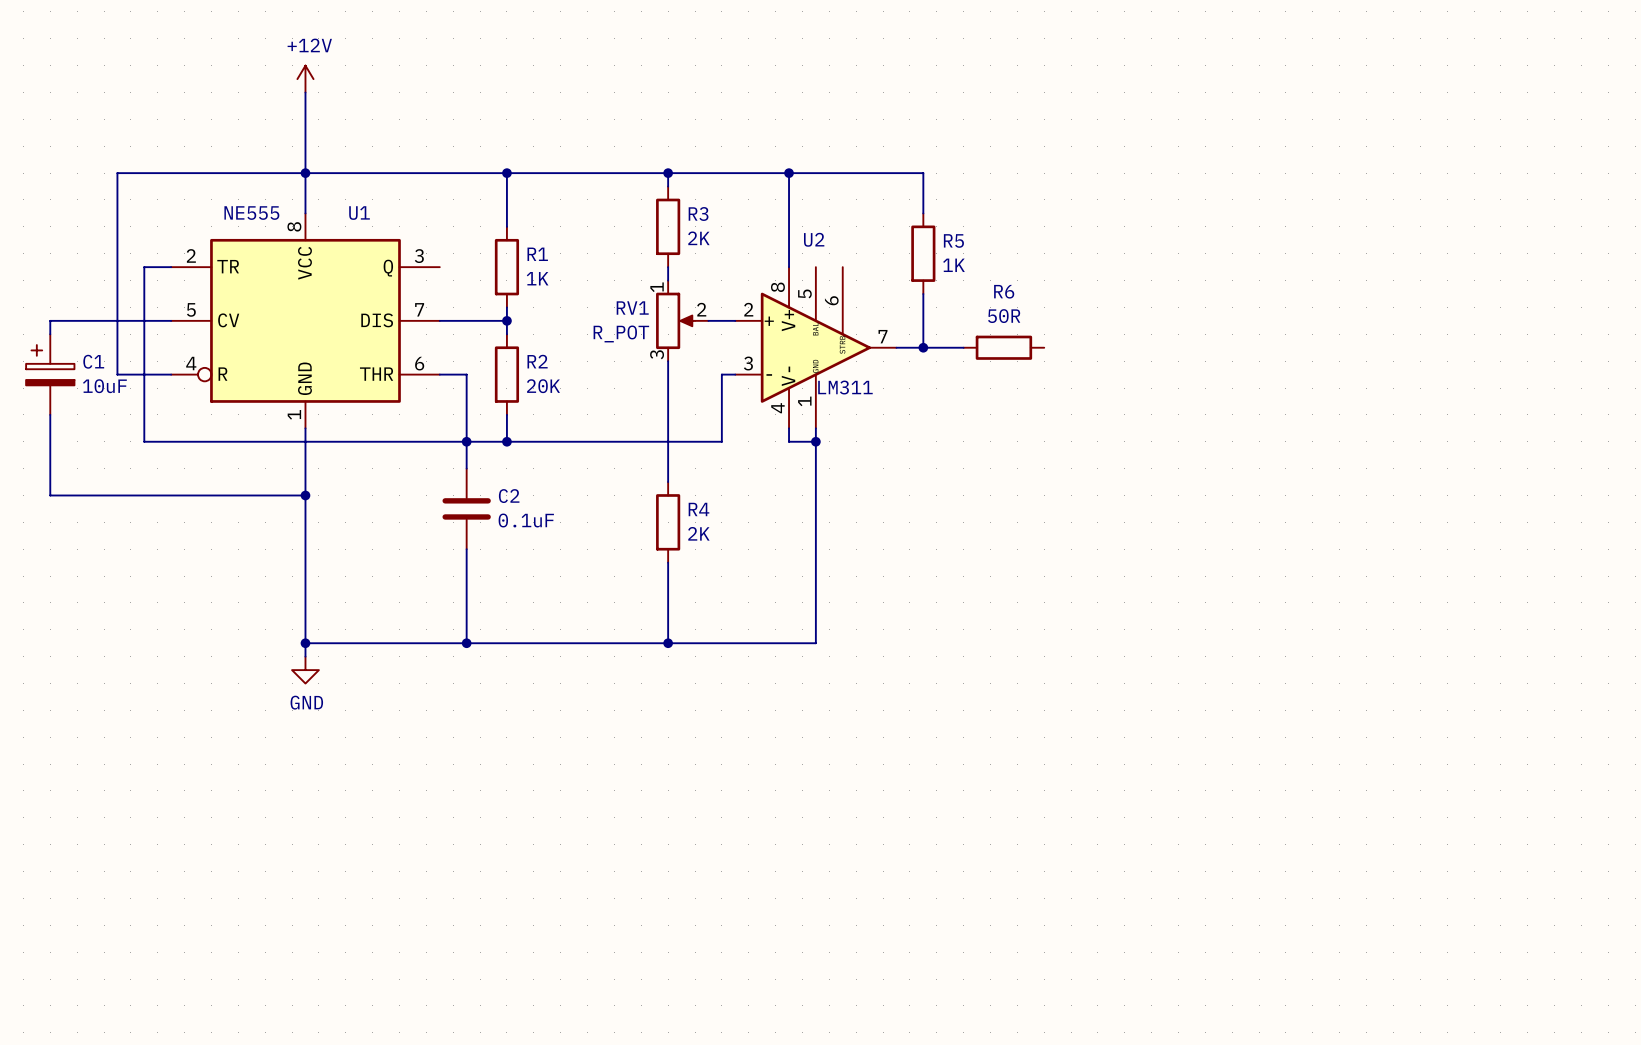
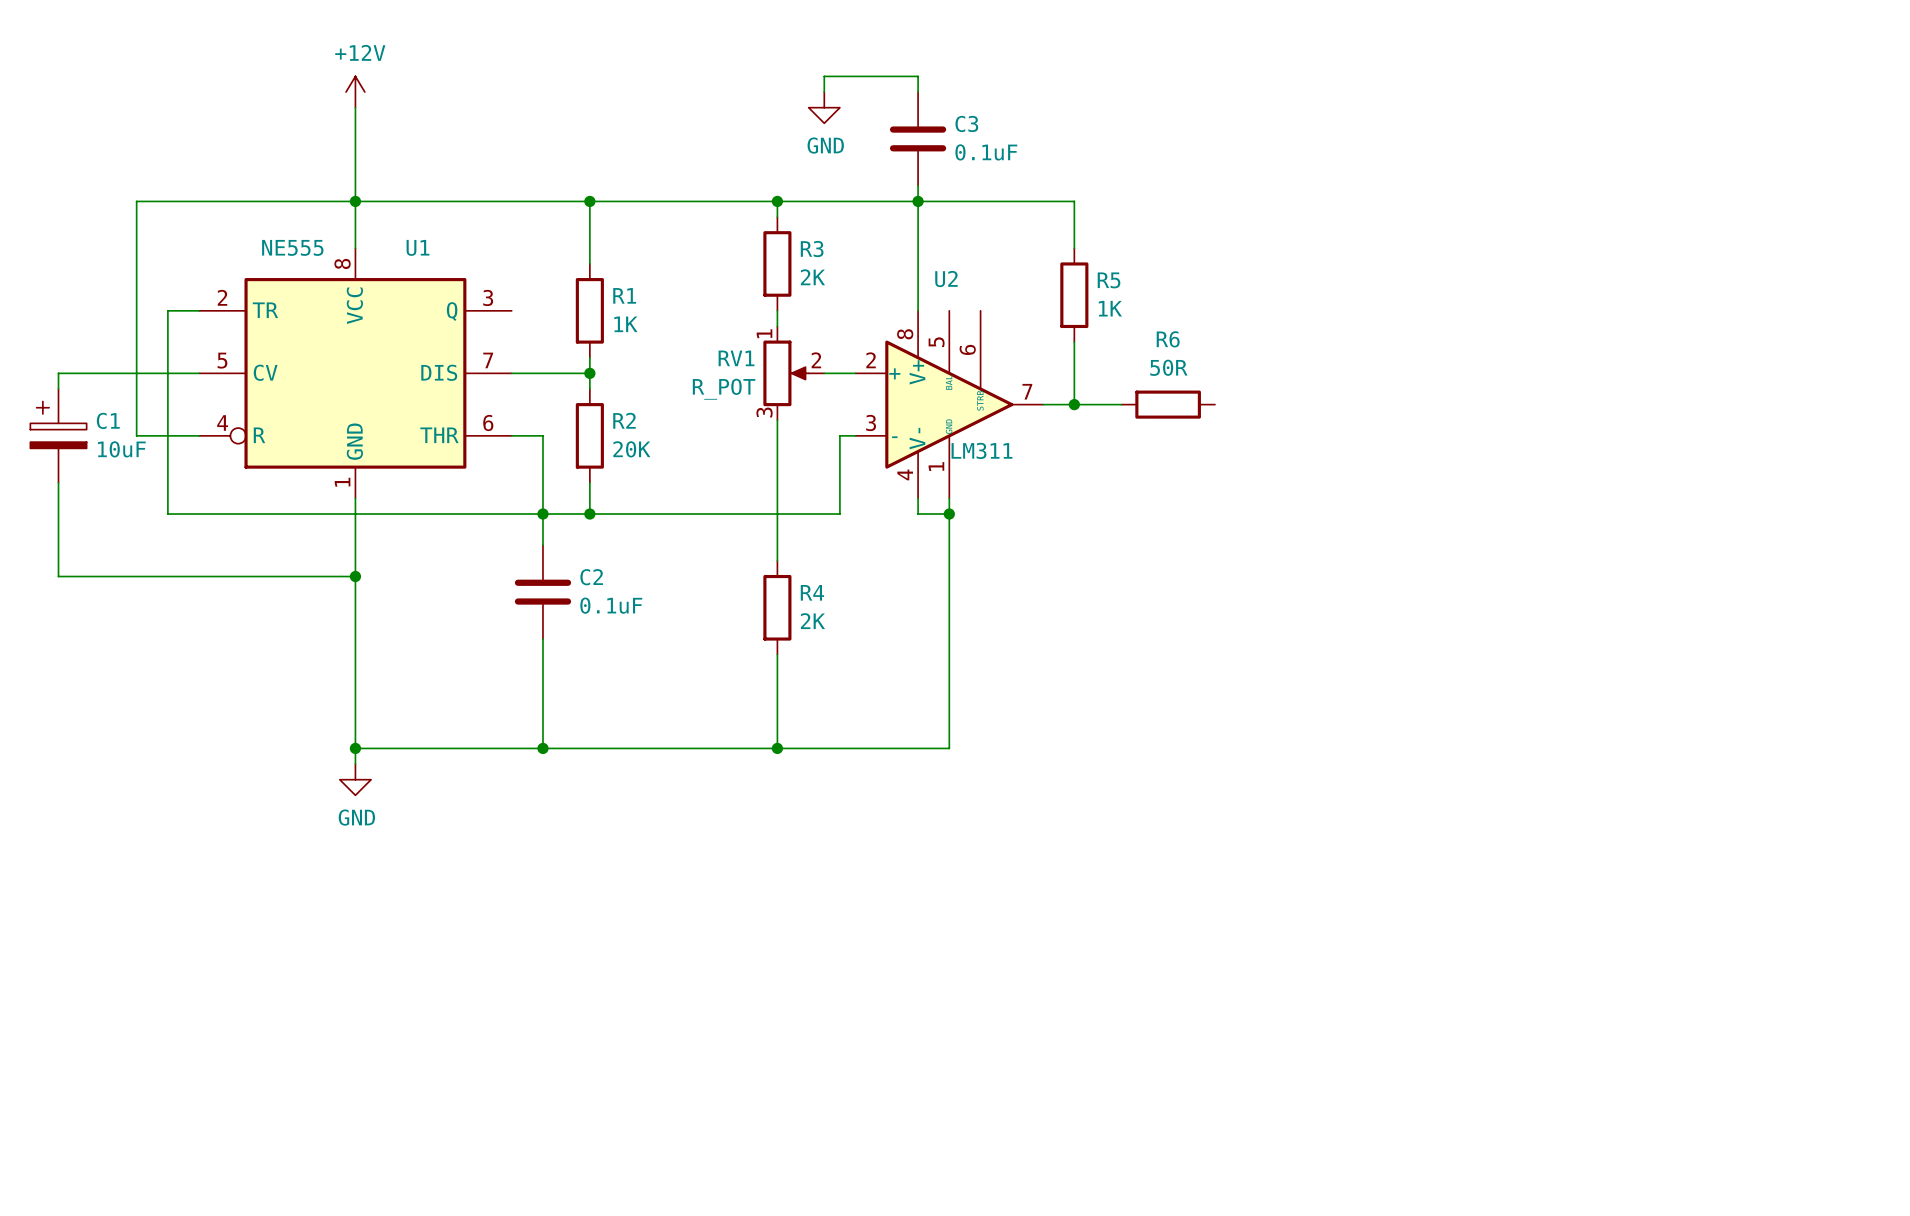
wire: none -> (824, 92) (824, 76) (918, 76) (918, 92)
power symbol: none -> GND (824, 107)
C3: none -> 0.1uF (918, 138)
wire: none -> (918, 185) (918, 201)

